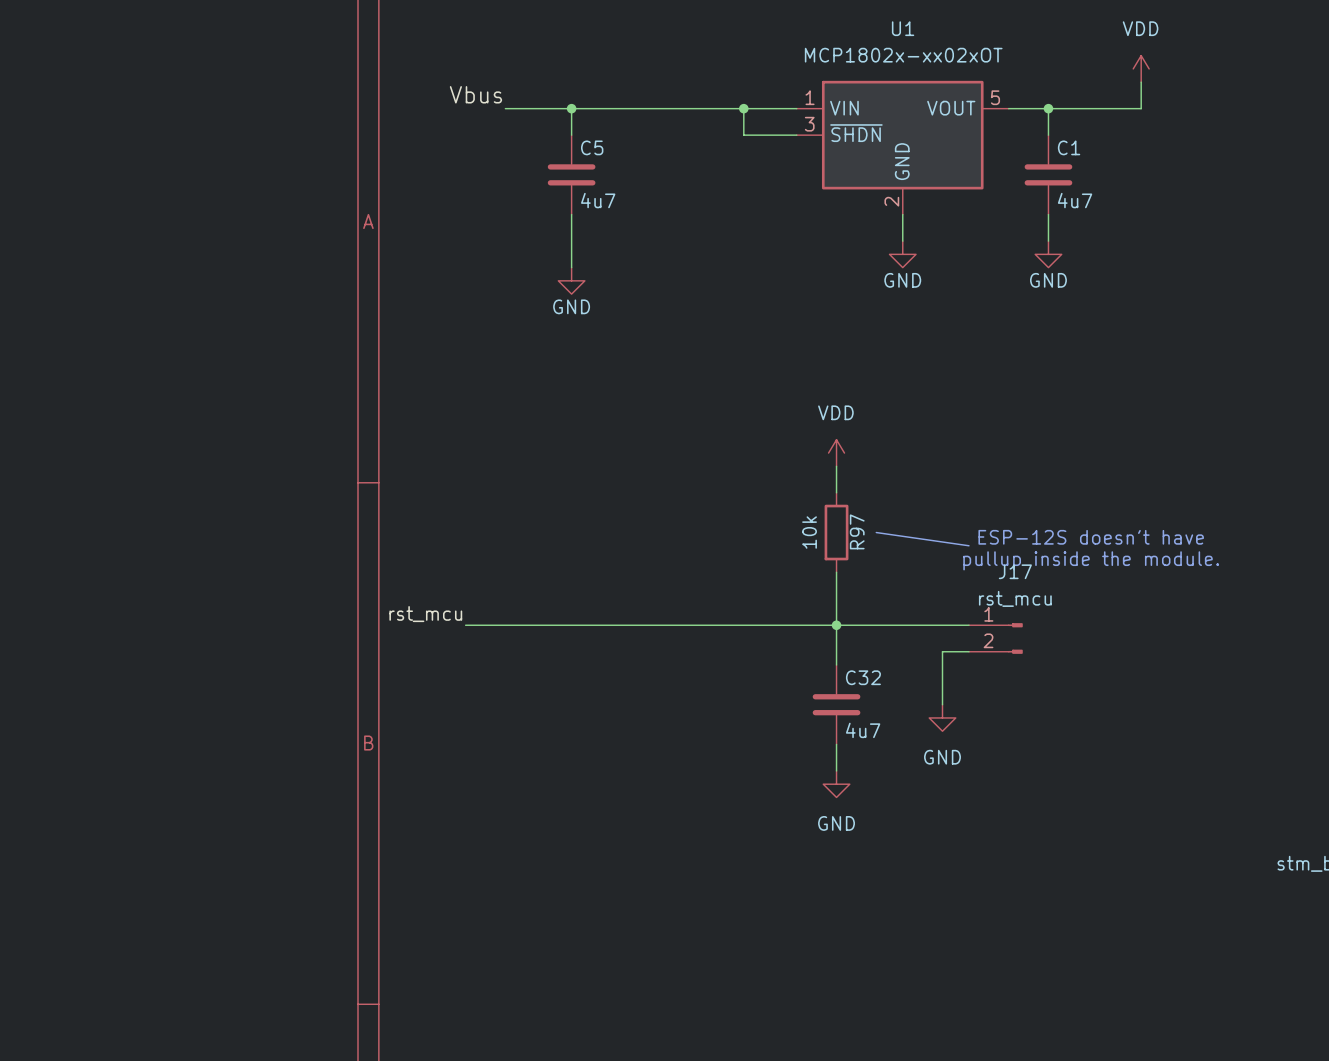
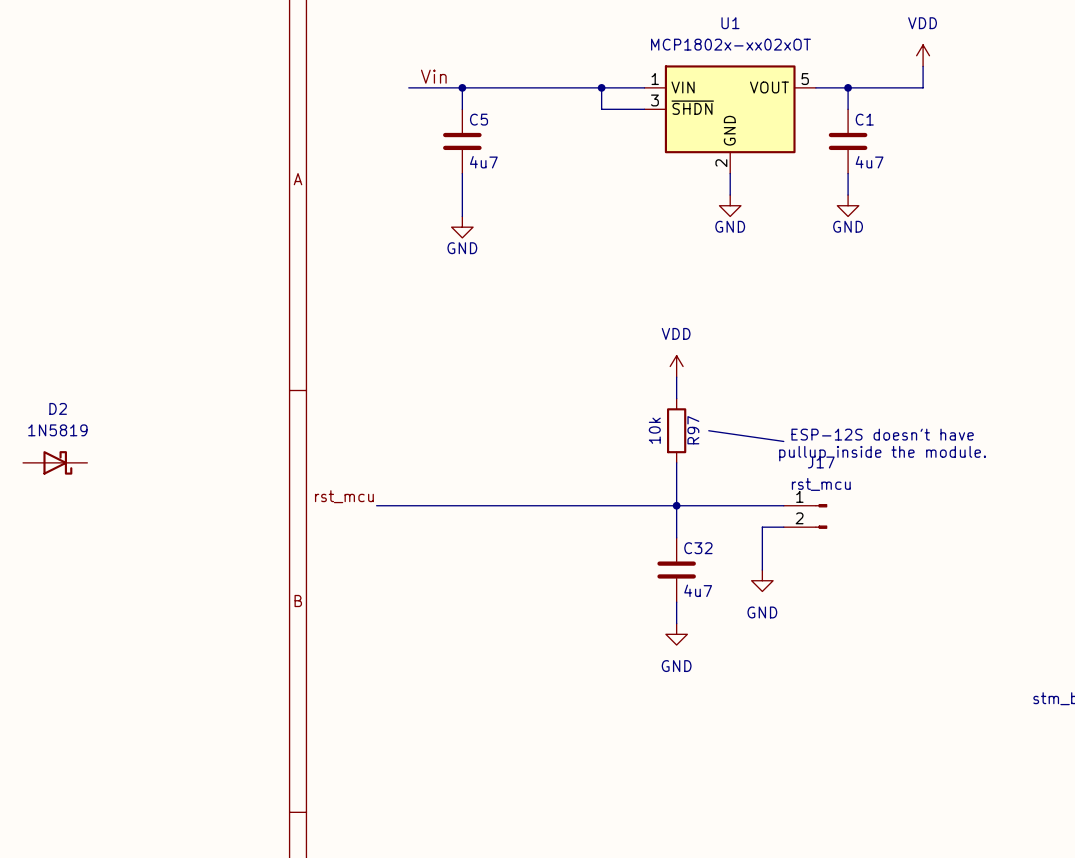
label: Vbus (475, 94) -> none
label: none -> Vin (433, 76)
D2: none -> 1N5819 (55, 462)

